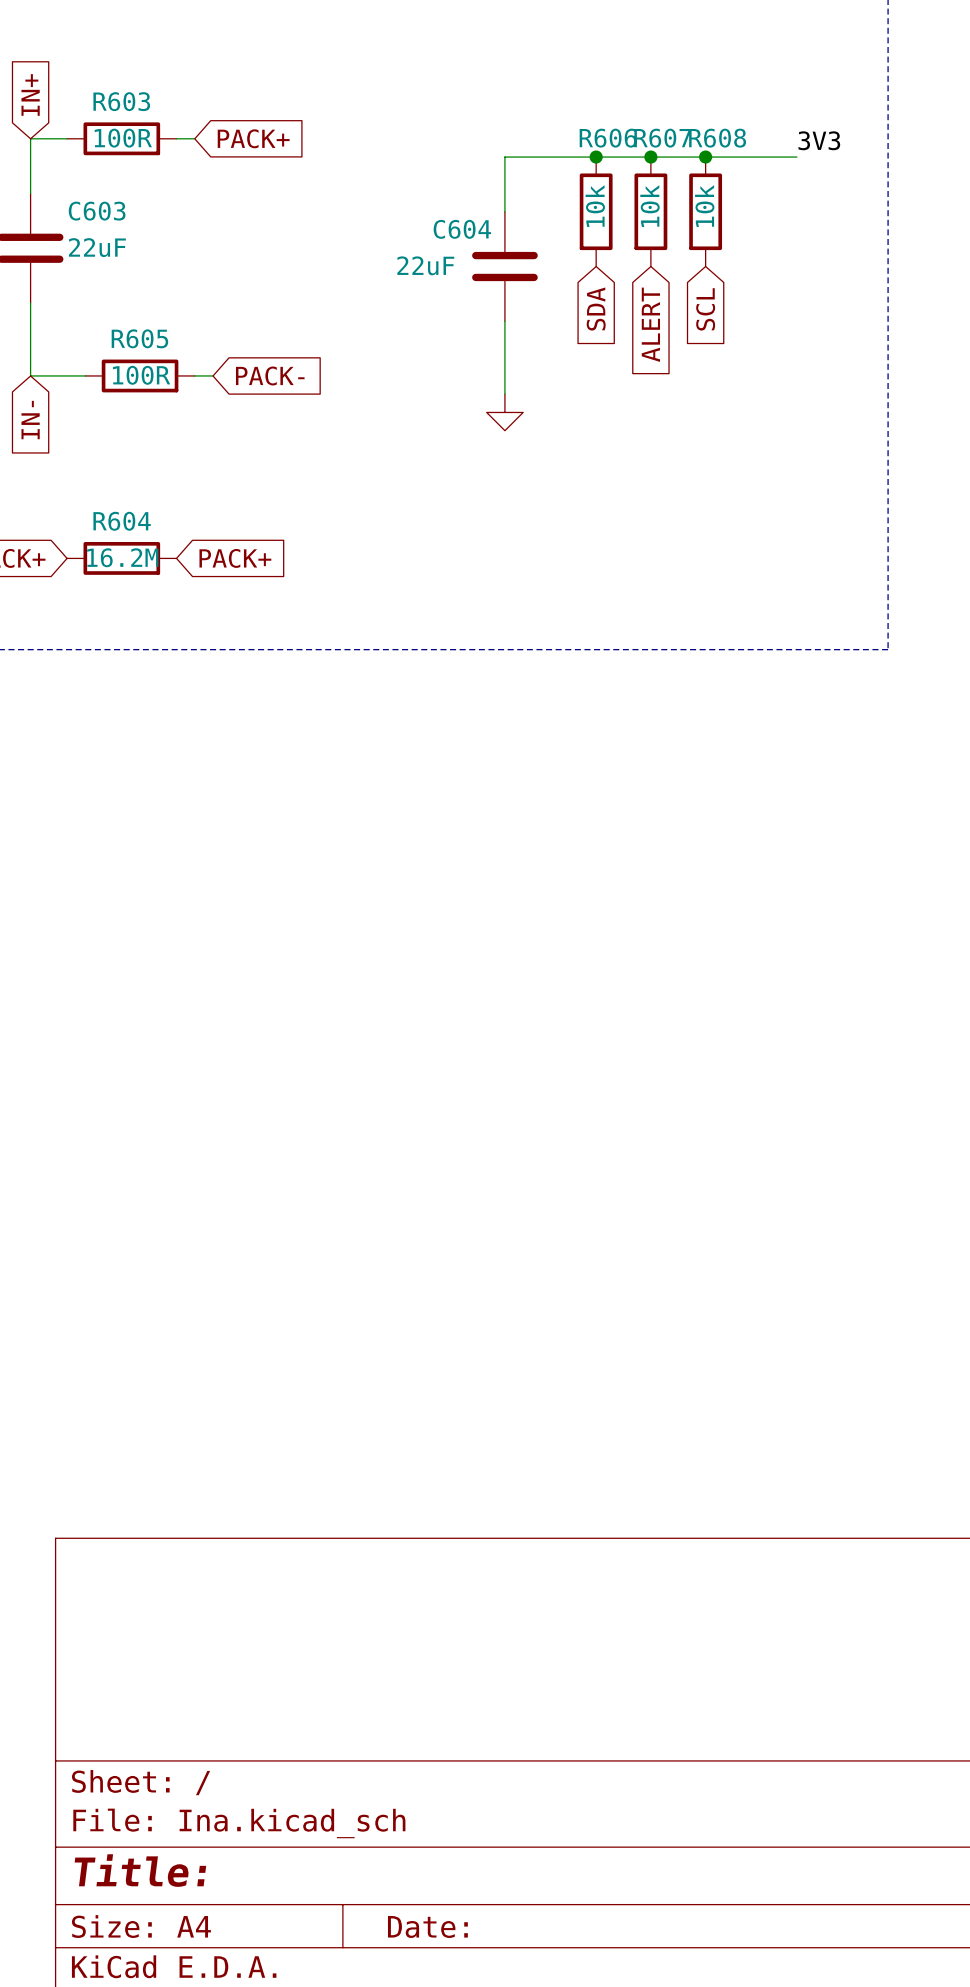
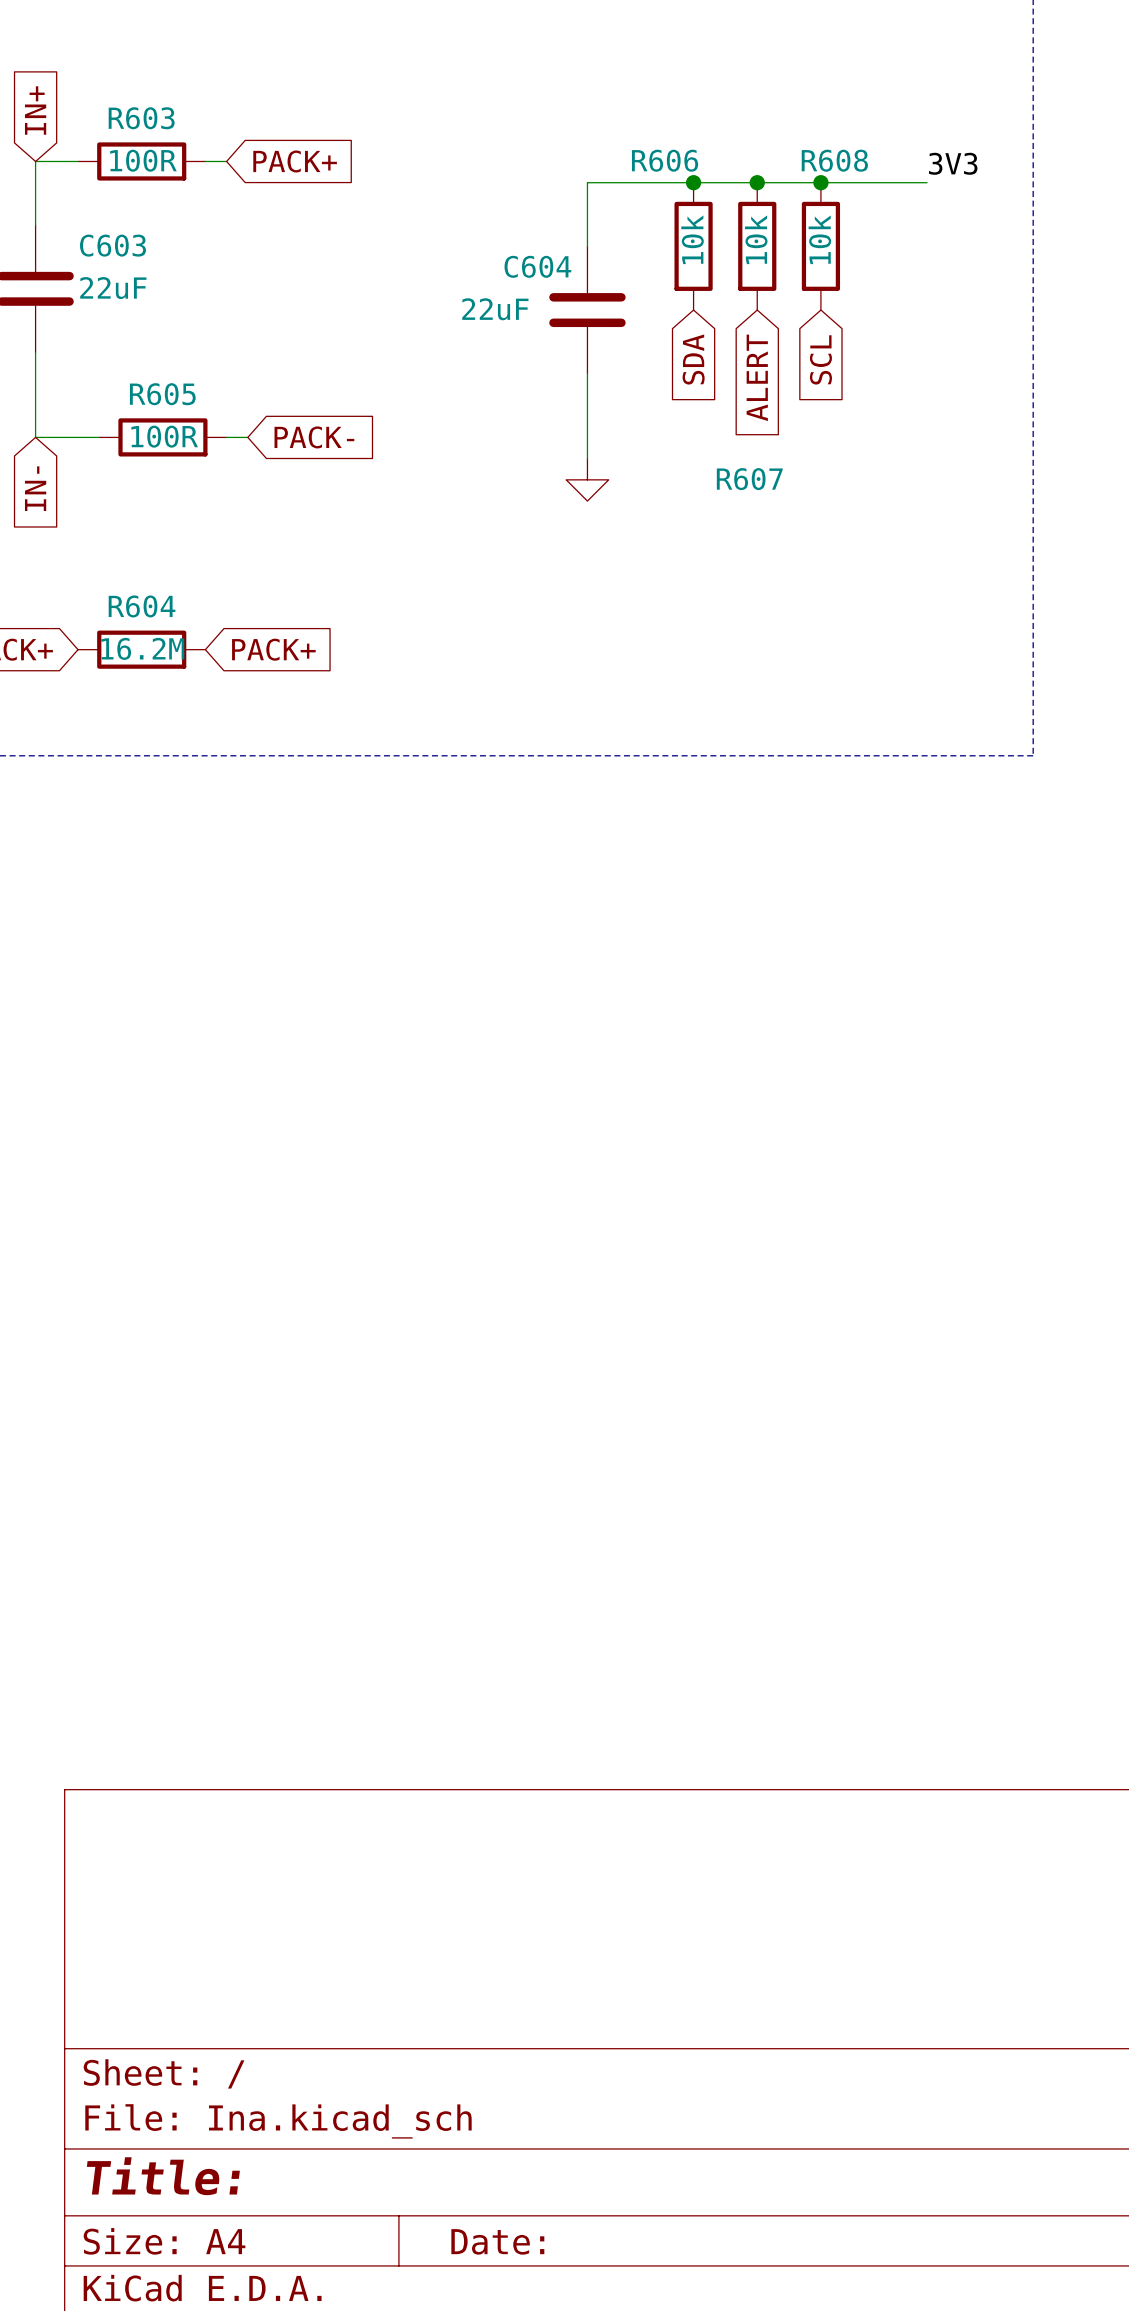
R606 name position: R606 (608, 138) -> R606 (665, 160)
R607 name position: R607 (662, 138) -> R607 (749, 479)

